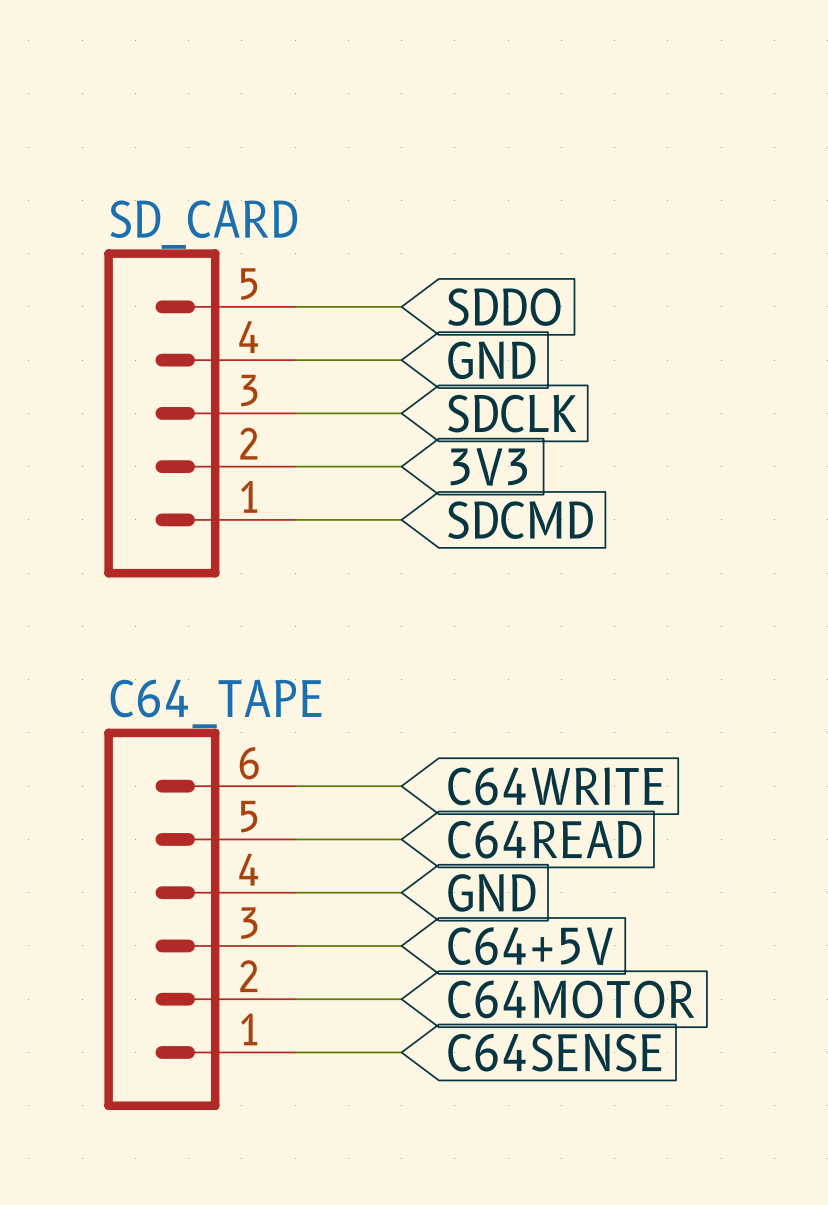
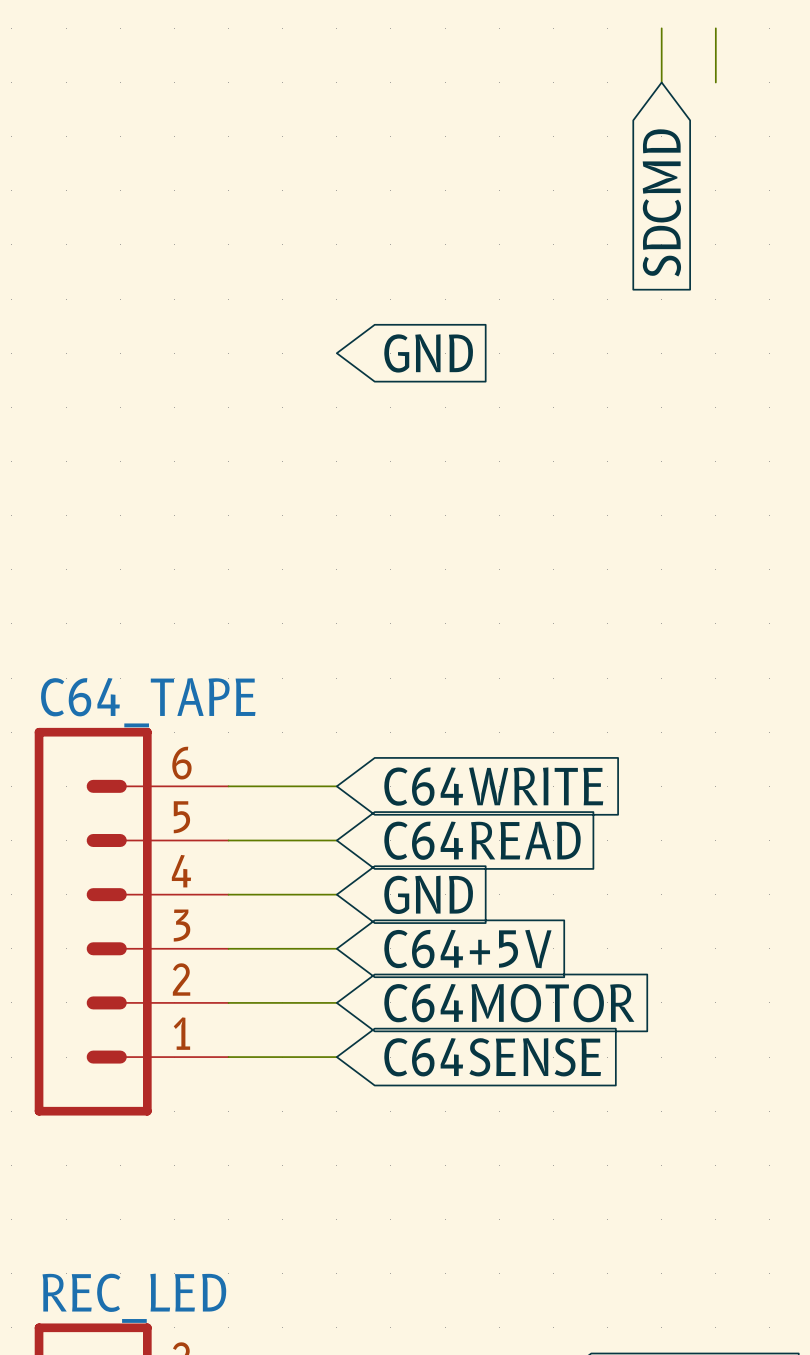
wire: none -> (661, 28) (661, 82)
wire: none -> (715, 28) (715, 82)
global label: none -> SDCMD (661, 202)
wire: (295, 306) (401, 306) -> none
global label: SDDO (504, 307) -> none
wire: (295, 360) (401, 360) -> none
SD_CARD: (199, 413) -> none
wire: (295, 413) (401, 413) -> none
global label: SDCLK (512, 413) -> none
wire: (295, 466) (401, 466) -> none
global label: 3V3 (488, 466) -> none
wire: (295, 519) (401, 519) -> none
global label: SDCMD (520, 520) -> none

